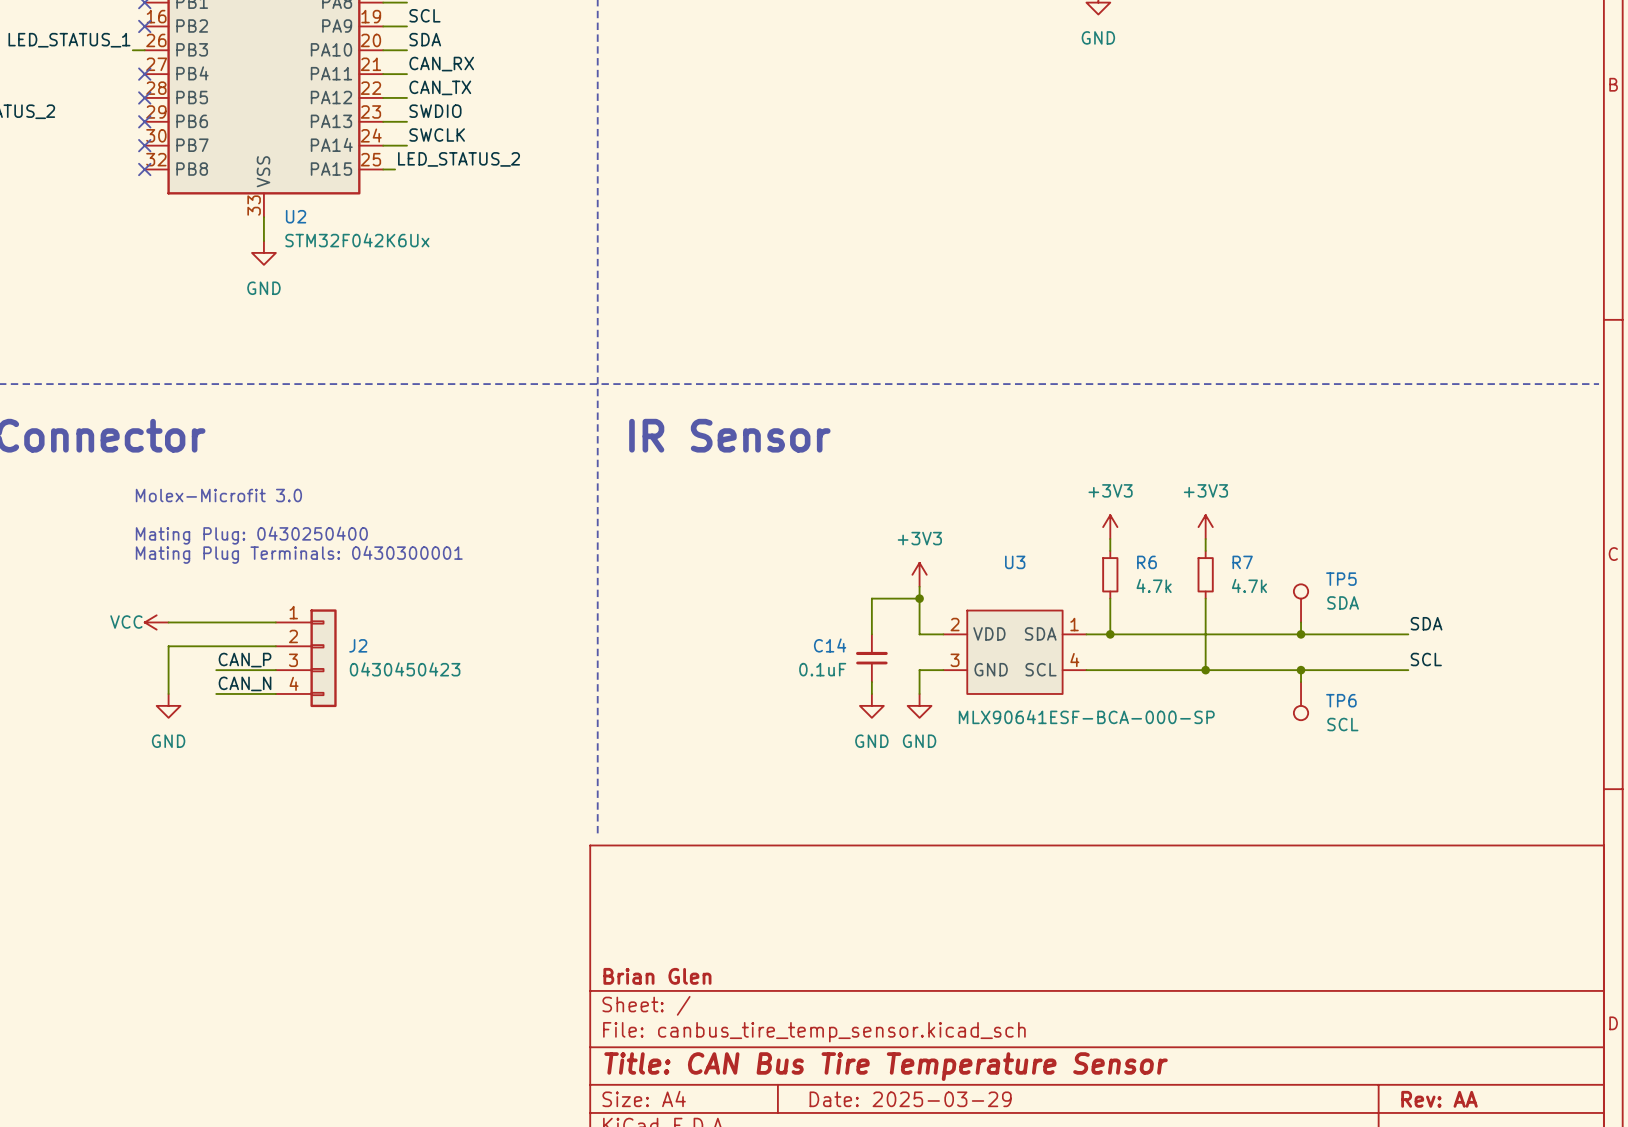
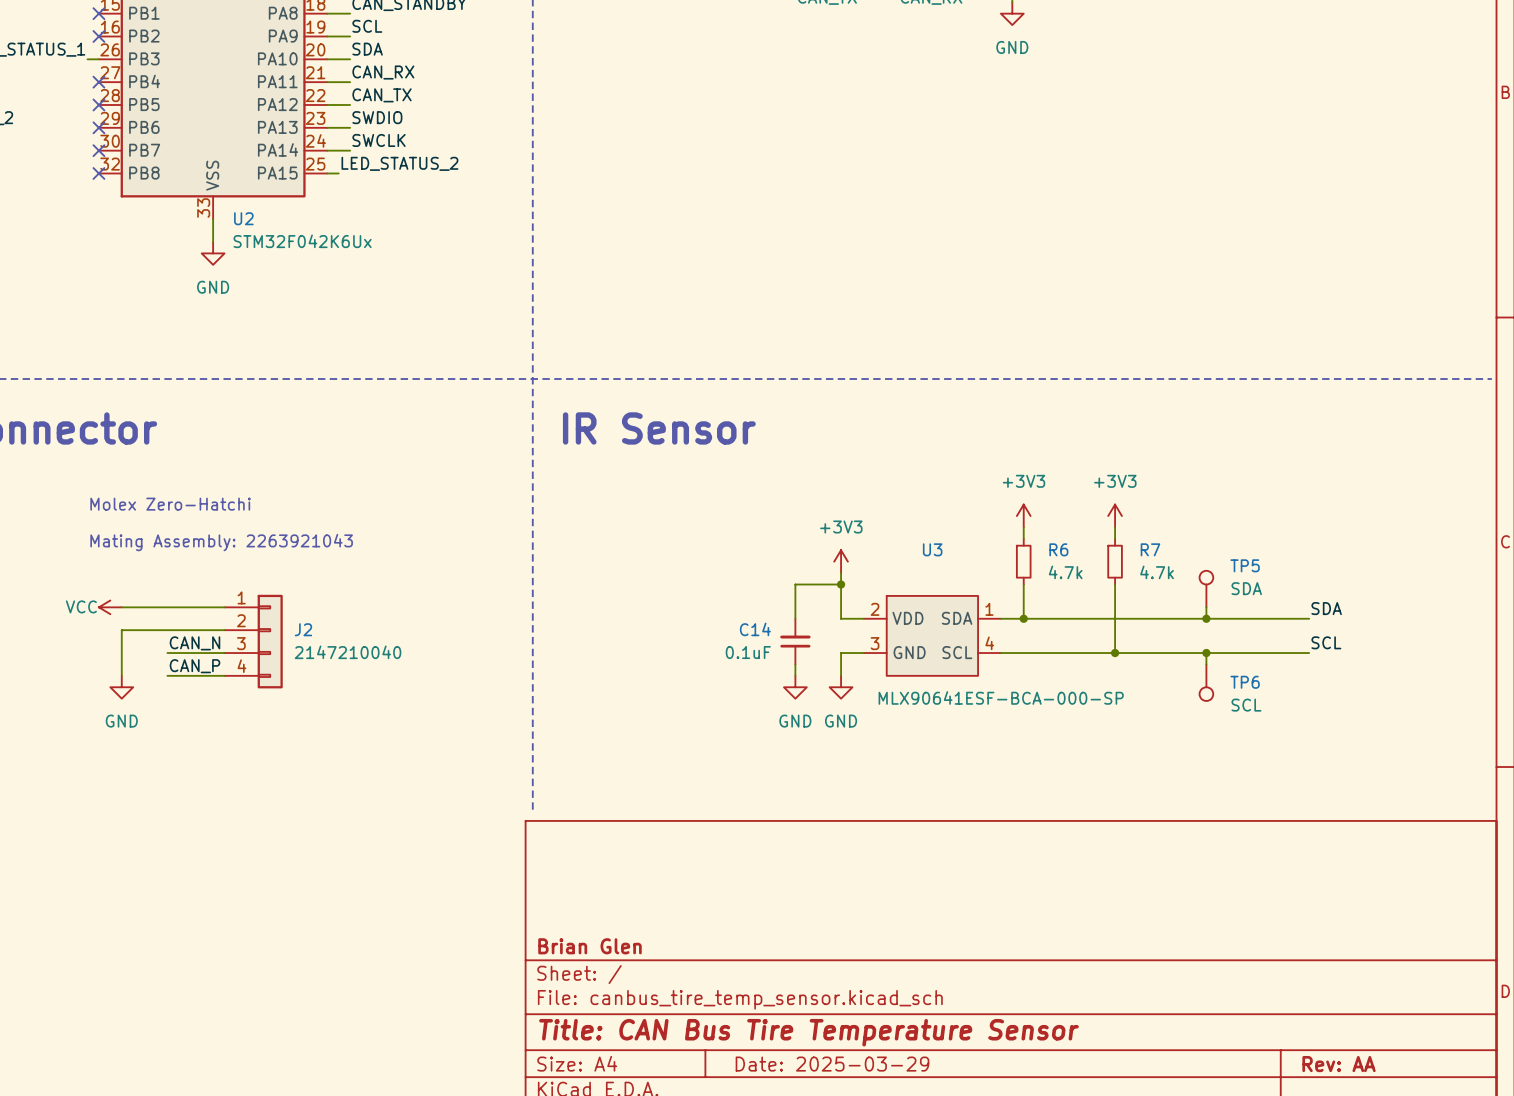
text: Molex-Microfit 3.0 (218, 495) -> none
text: none -> Molex Zero-Hatchi (170, 504)
text: Mating Plug: 0430250400 (251, 535) -> none
text: Mating Plug Terminals: 0430300001 (299, 554) -> Mating Assembly: 2263921043 (221, 542)
label: CAN_P (245, 660) -> CAN_N (194, 643)
J2 value: 0430450423 (405, 669) -> 2147210040 (348, 652)
label: CAN_N (245, 683) -> CAN_P (194, 666)

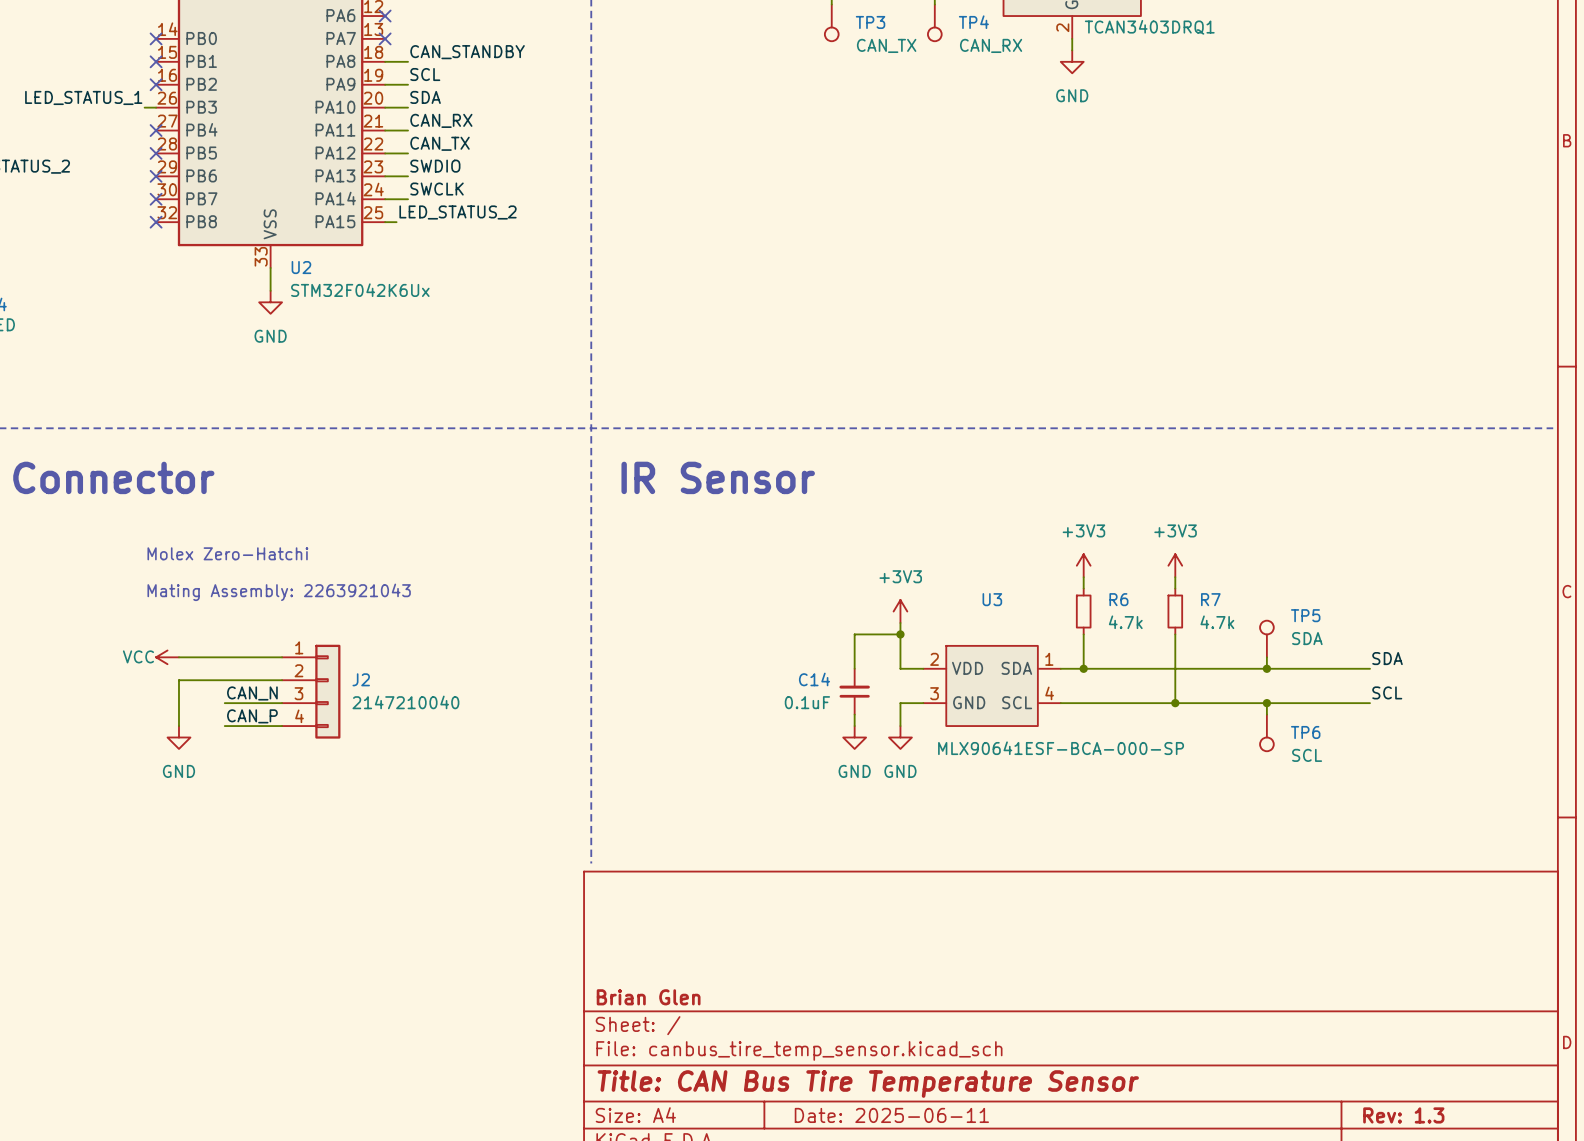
title block: Date: 2025-03-29 (832, 1064) -> Date: 2025-06-11 (891, 1115)
title block: Rev: AA (1339, 1064) -> Rev: 1.3 (1403, 1115)

